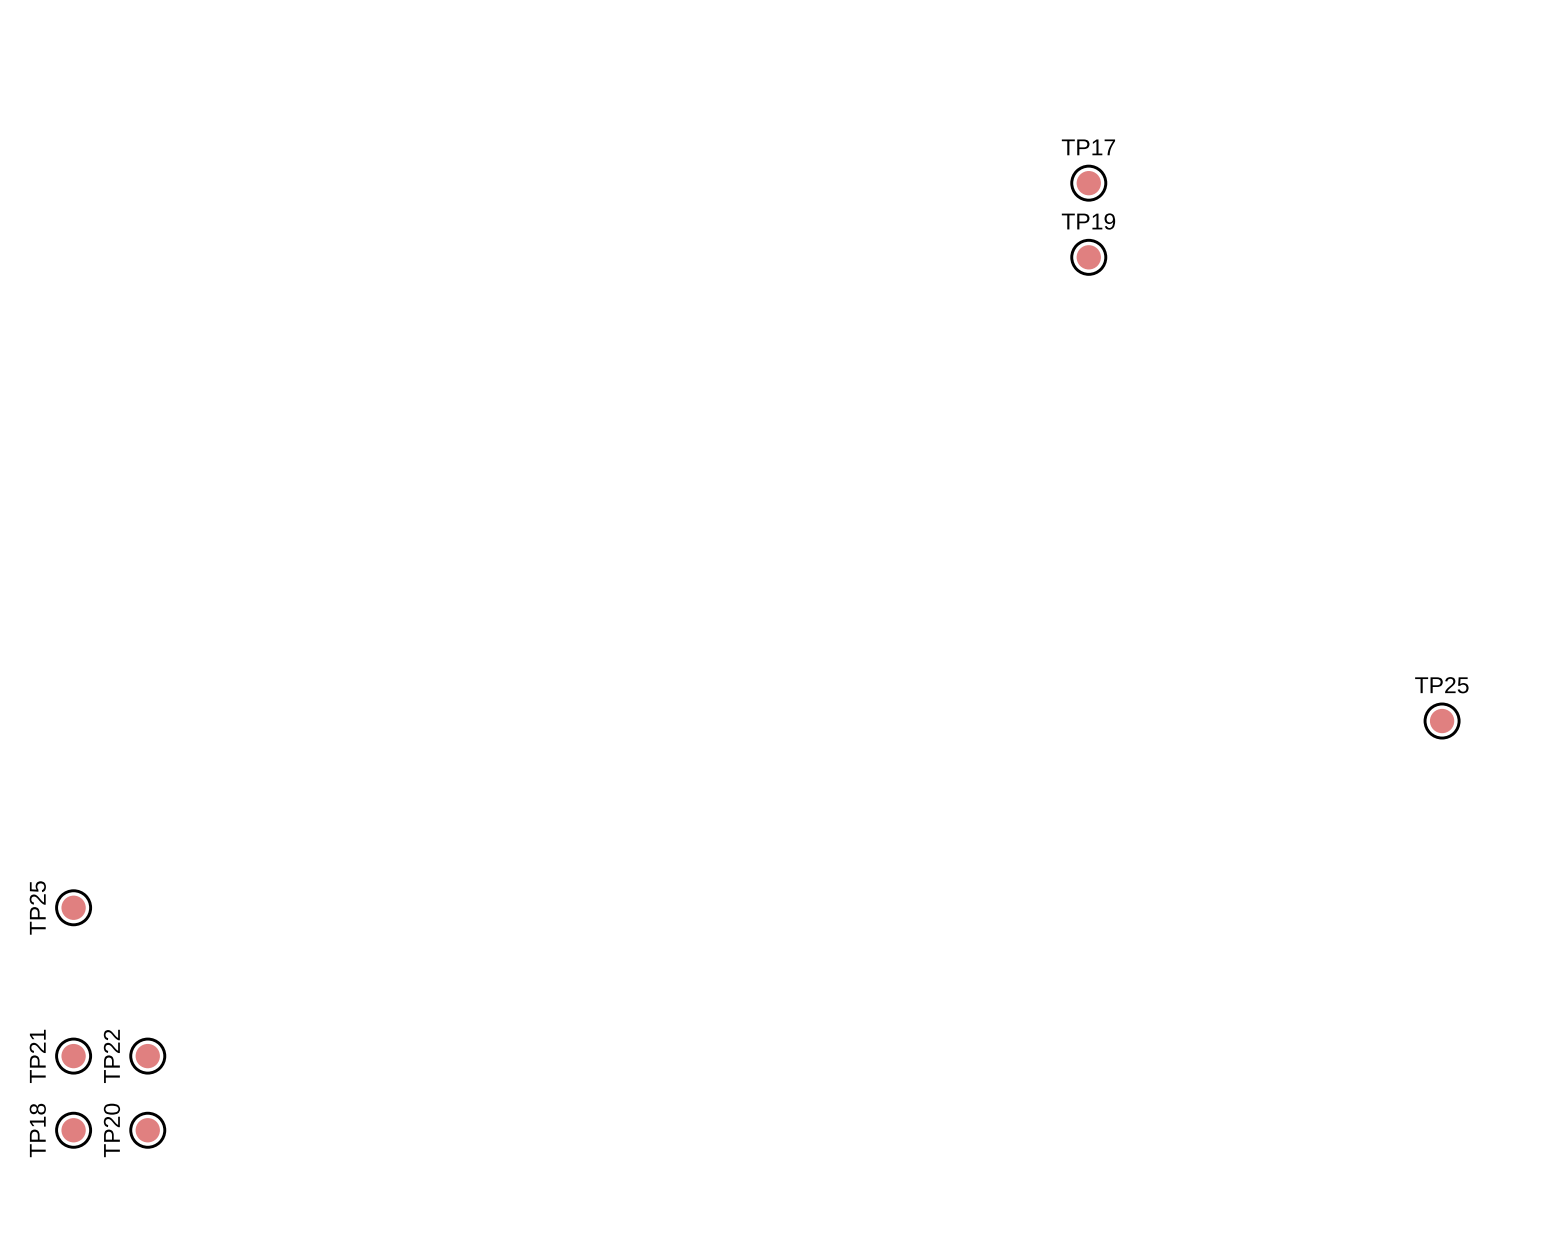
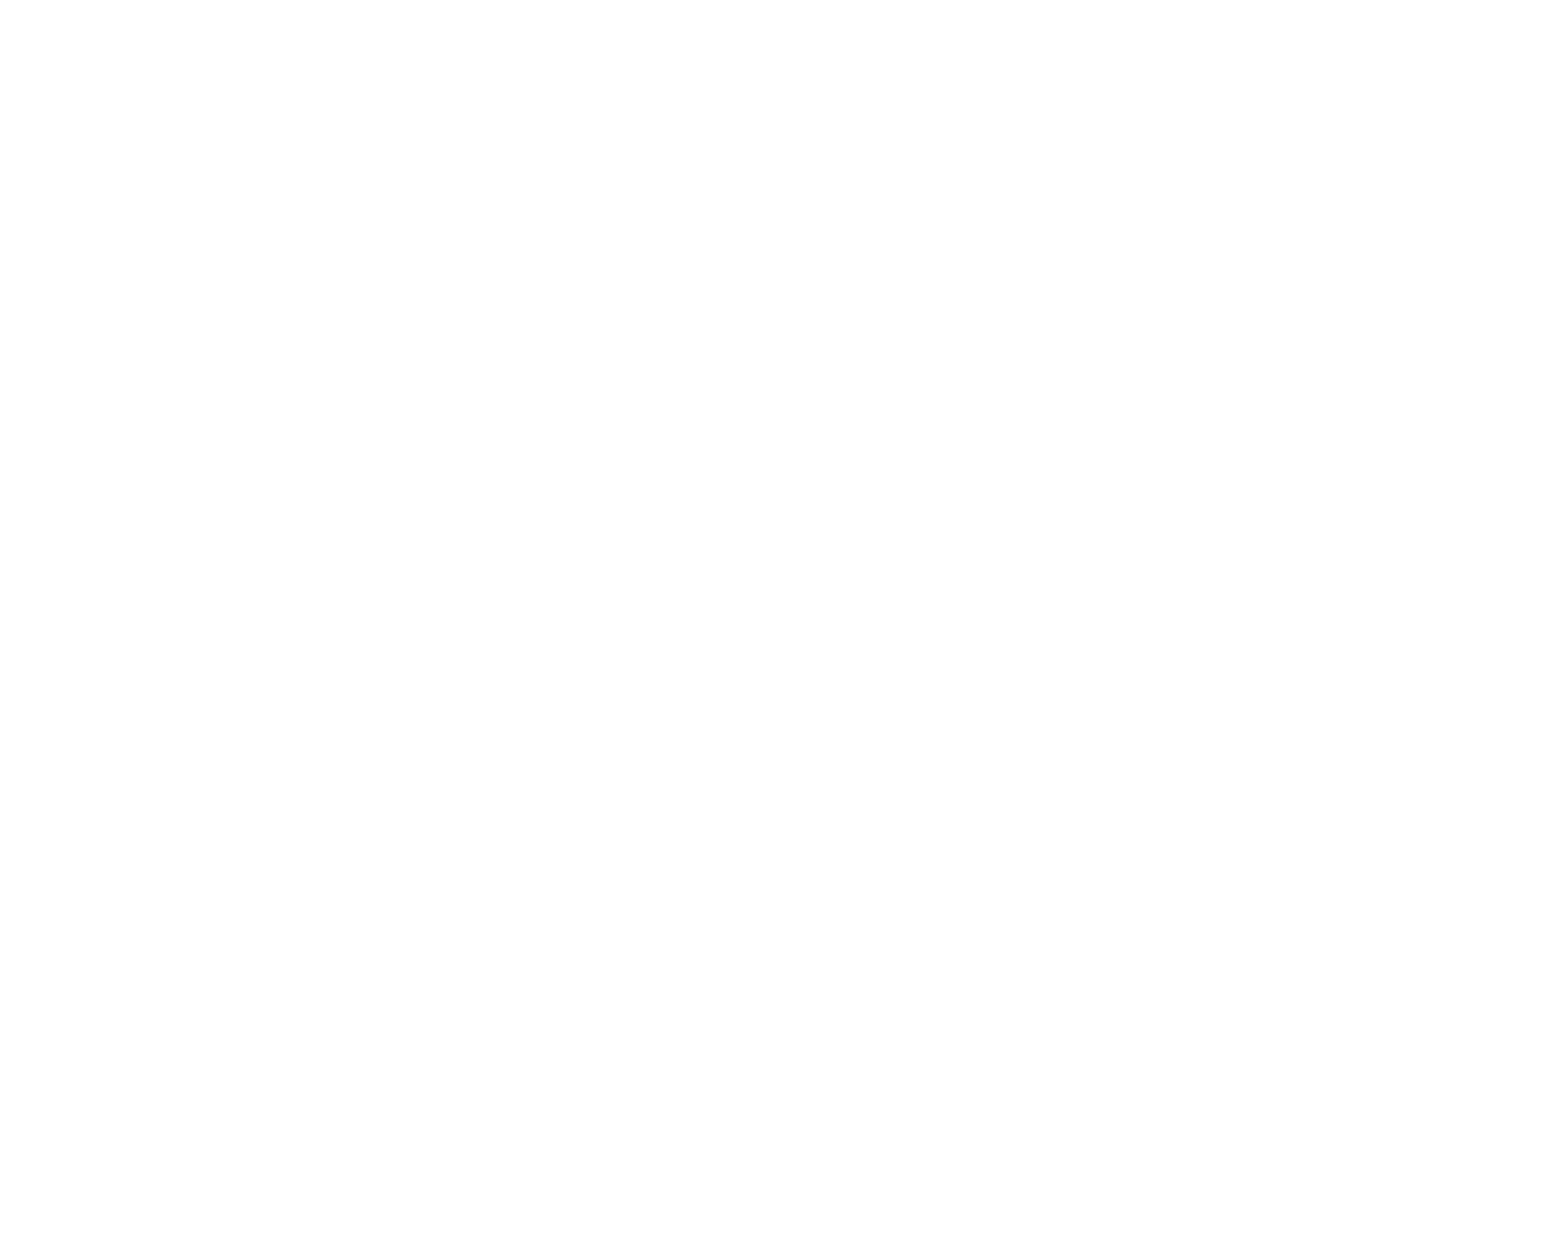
TP17: (1088, 183) -> none
TP19: (1088, 257) -> none
TP25: (1442, 721) -> none
TP25: (73, 907) -> none
TP21: (73, 1056) -> none
TP22: (147, 1056) -> none
TP18: (73, 1130) -> none
TP20: (147, 1130) -> none

